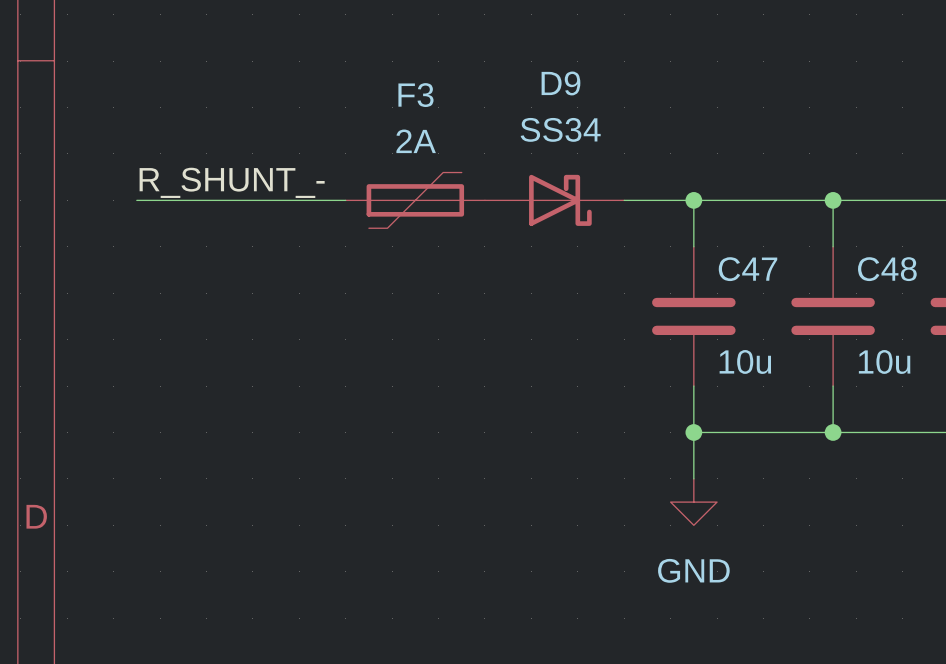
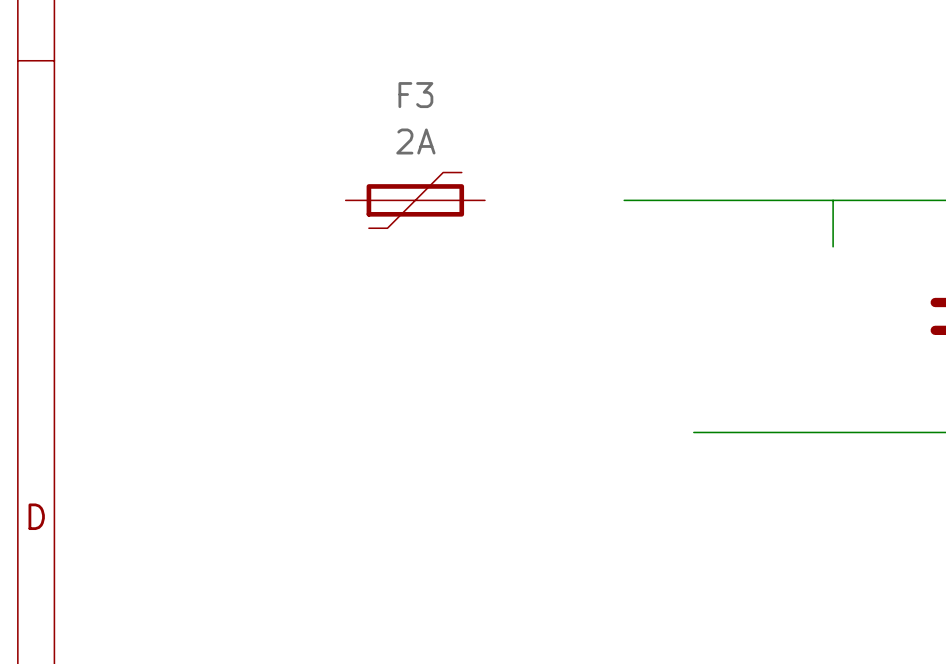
label: R_SHUNT_- (232, 182) -> none
wire: (136, 200) (345, 200) -> none
D9: SS34 (554, 200) -> none
wire: (693, 200) (693, 246) -> none
junction: (693, 200) -> none
junction: (833, 200) -> none
C47: 10u (693, 316) -> none
C48: 10u (833, 316) -> none
wire: (693, 386) (693, 478) -> none
wire: (833, 386) (833, 432) -> none
junction: (693, 432) -> none
junction: (833, 432) -> none
power symbol: GND (693, 502) -> none

